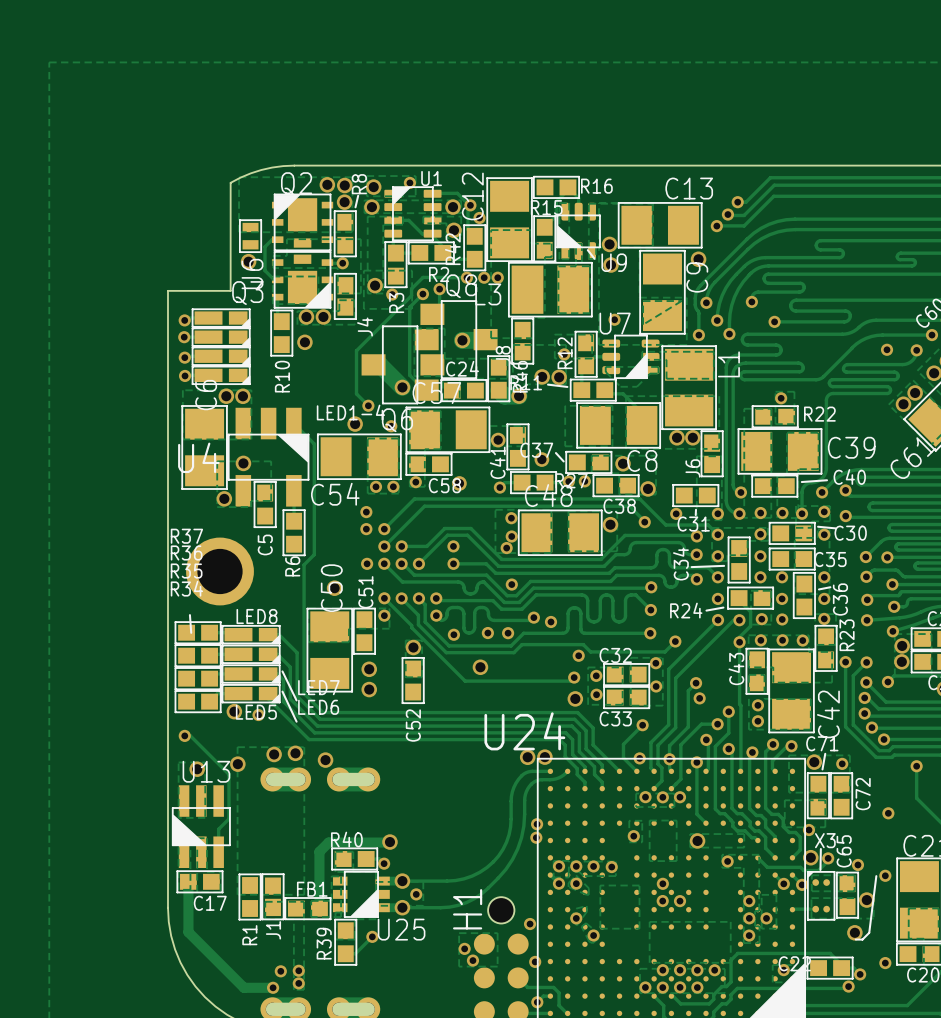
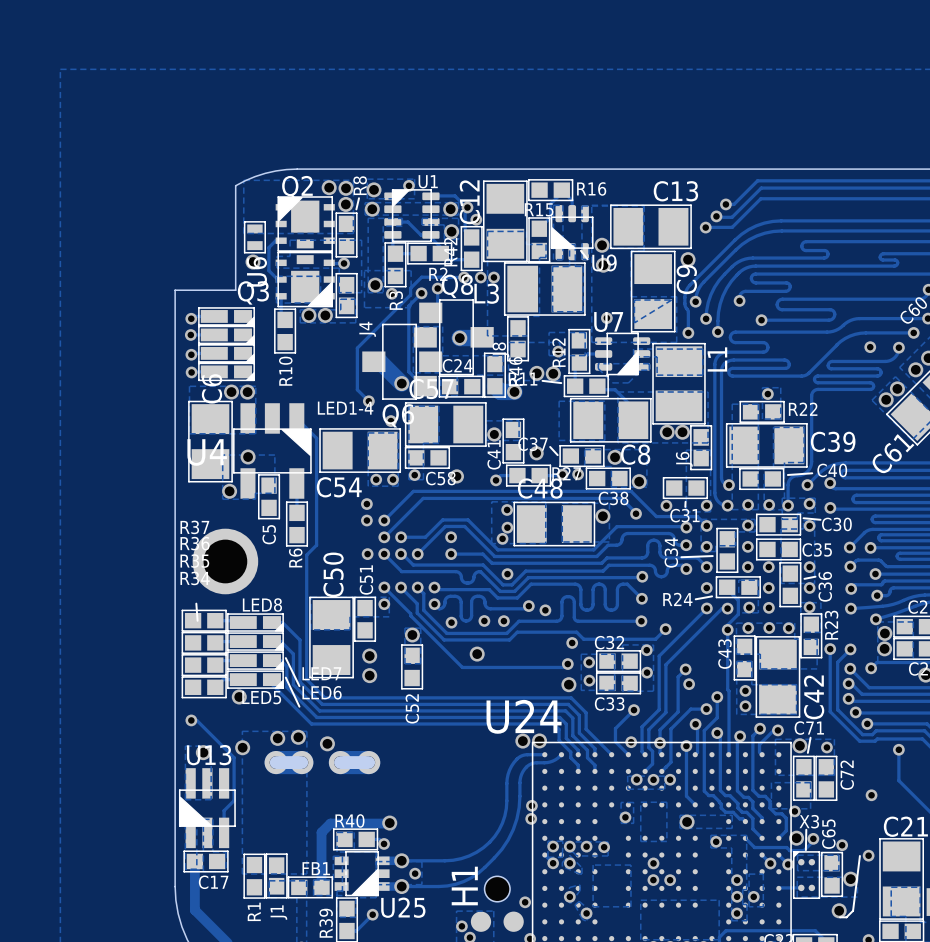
via: (304, 342) -> none
via: (355, 424) -> none
via: (334, 588) -> none
via: (258, 715) -> none

